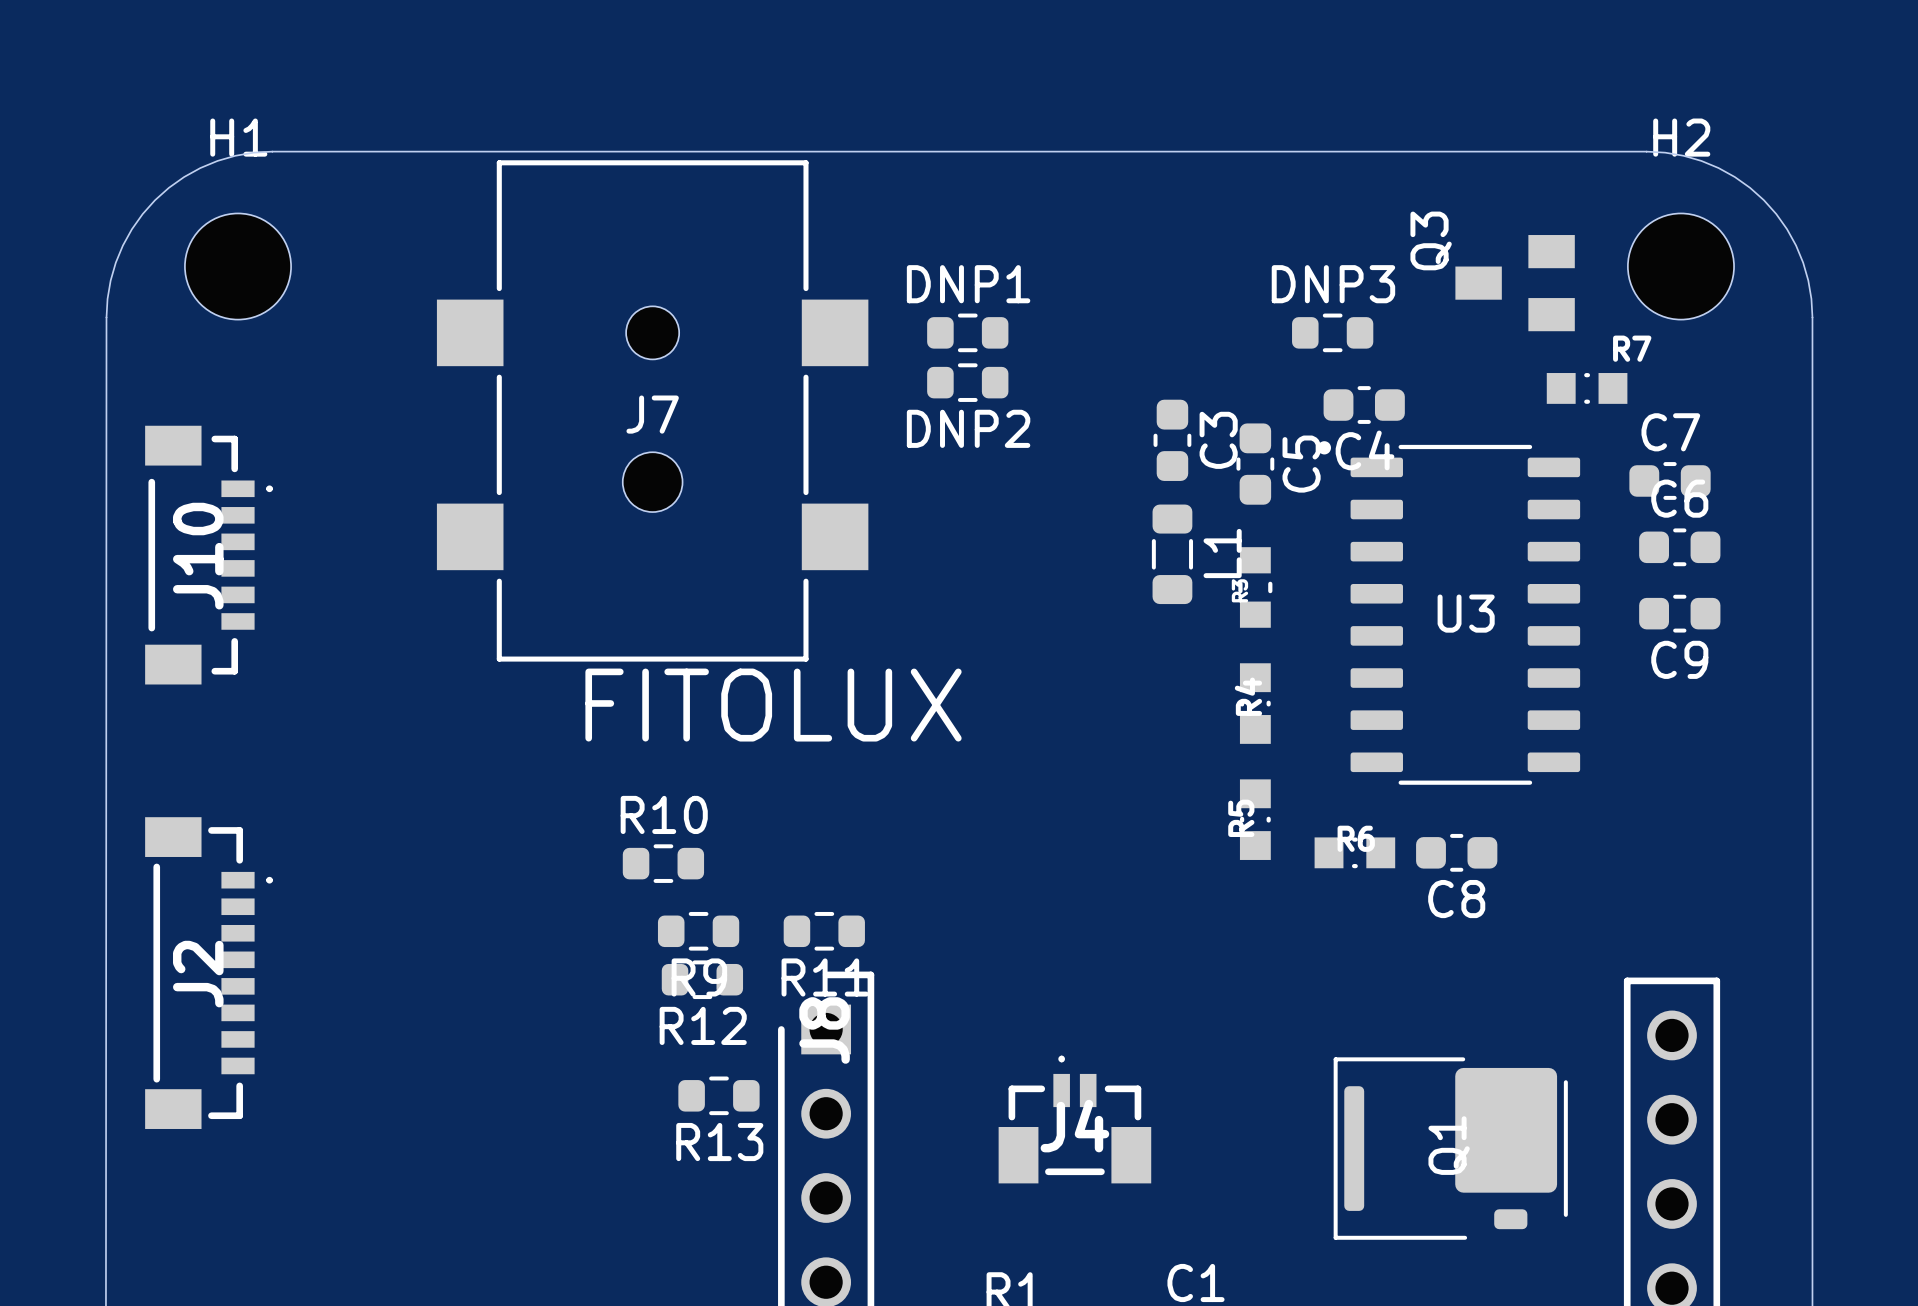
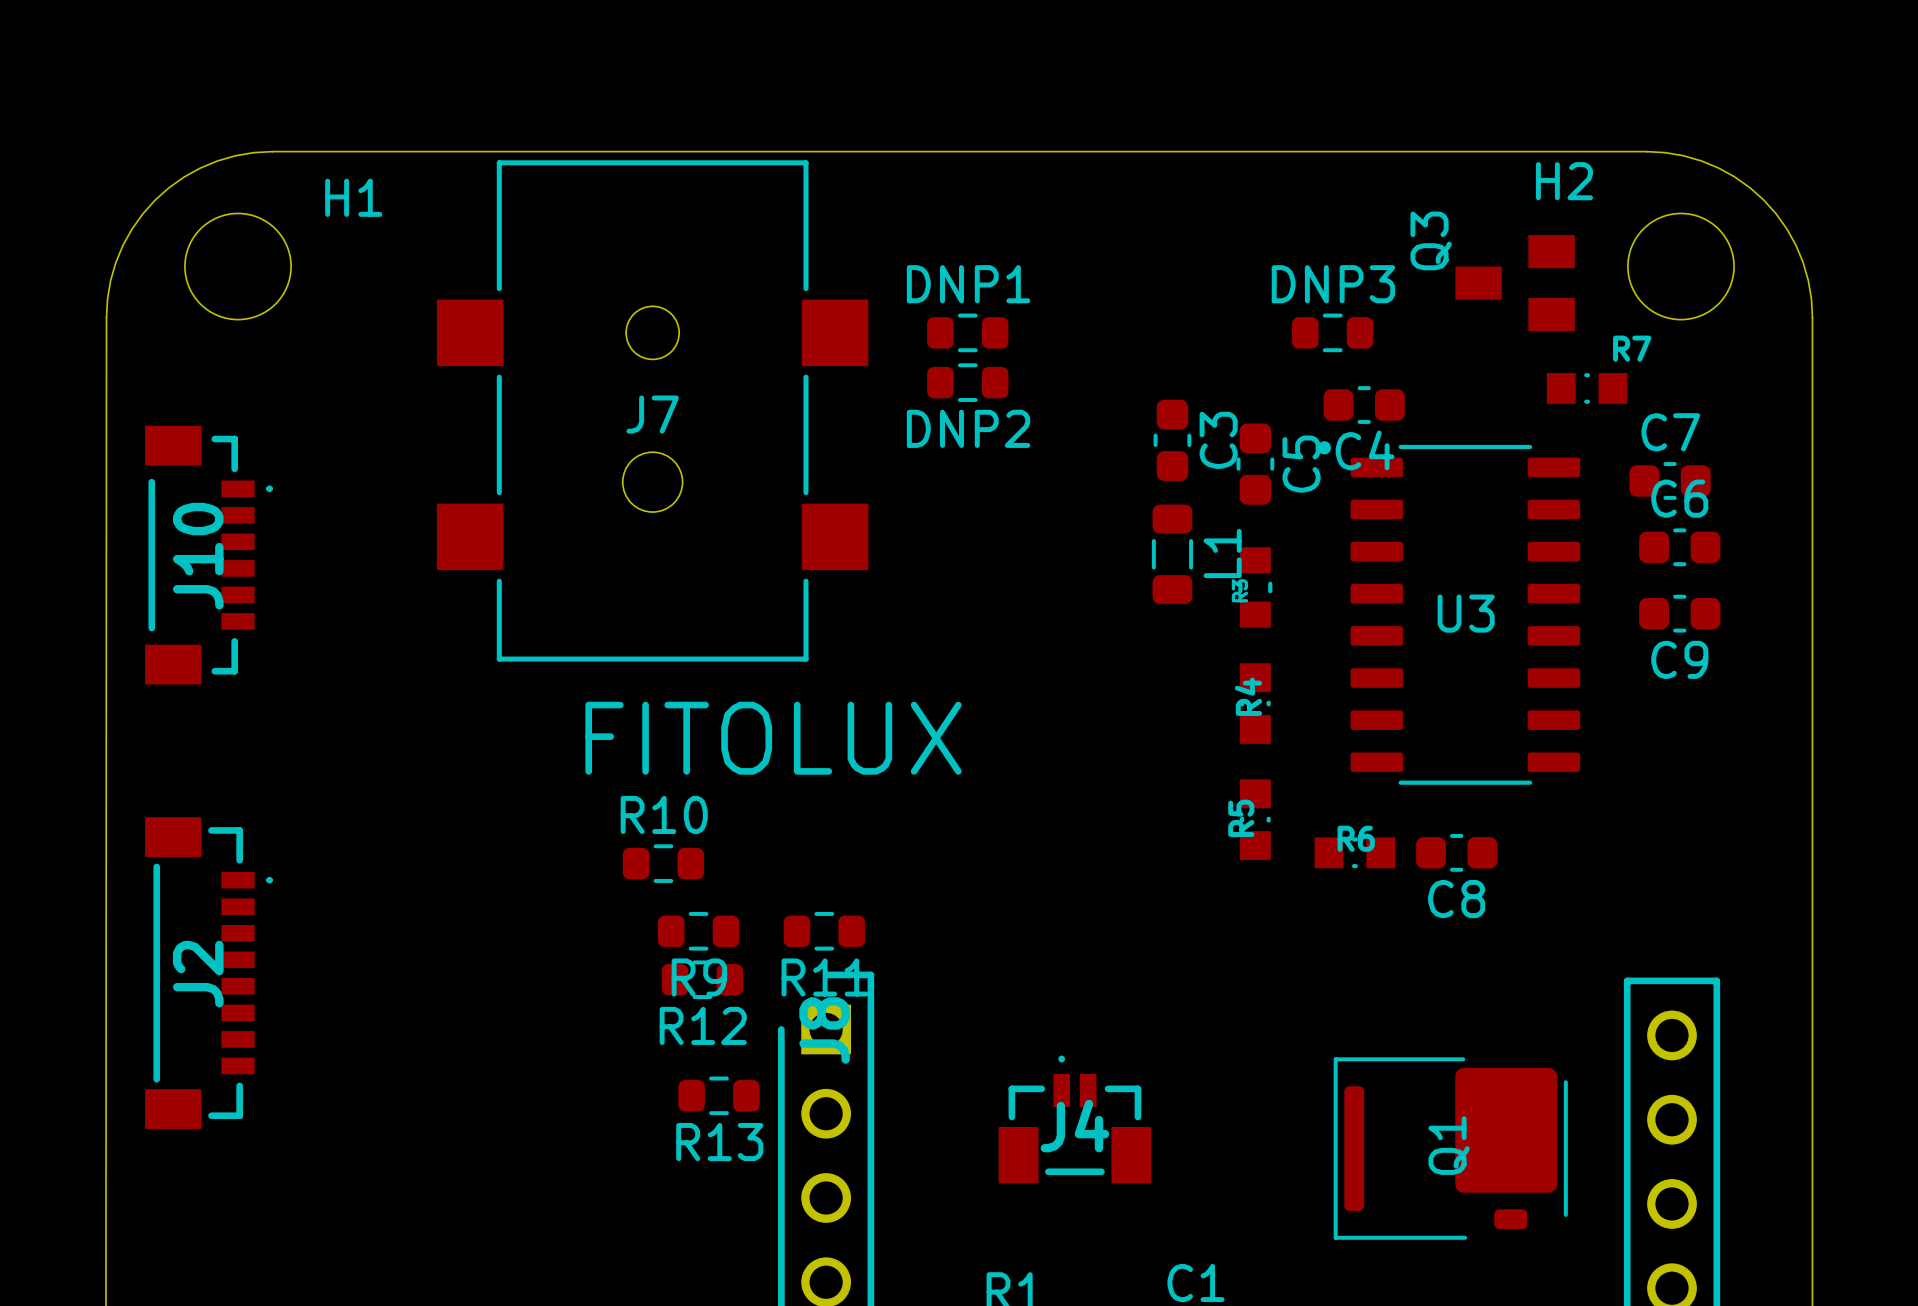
H1 name position: H1 (238, 137) -> H1 (353, 197)
H2 name position: H2 (1681, 137) -> H2 (1564, 181)
text position: FITOLUX (773, 705) -> FITOLUX (773, 738)

